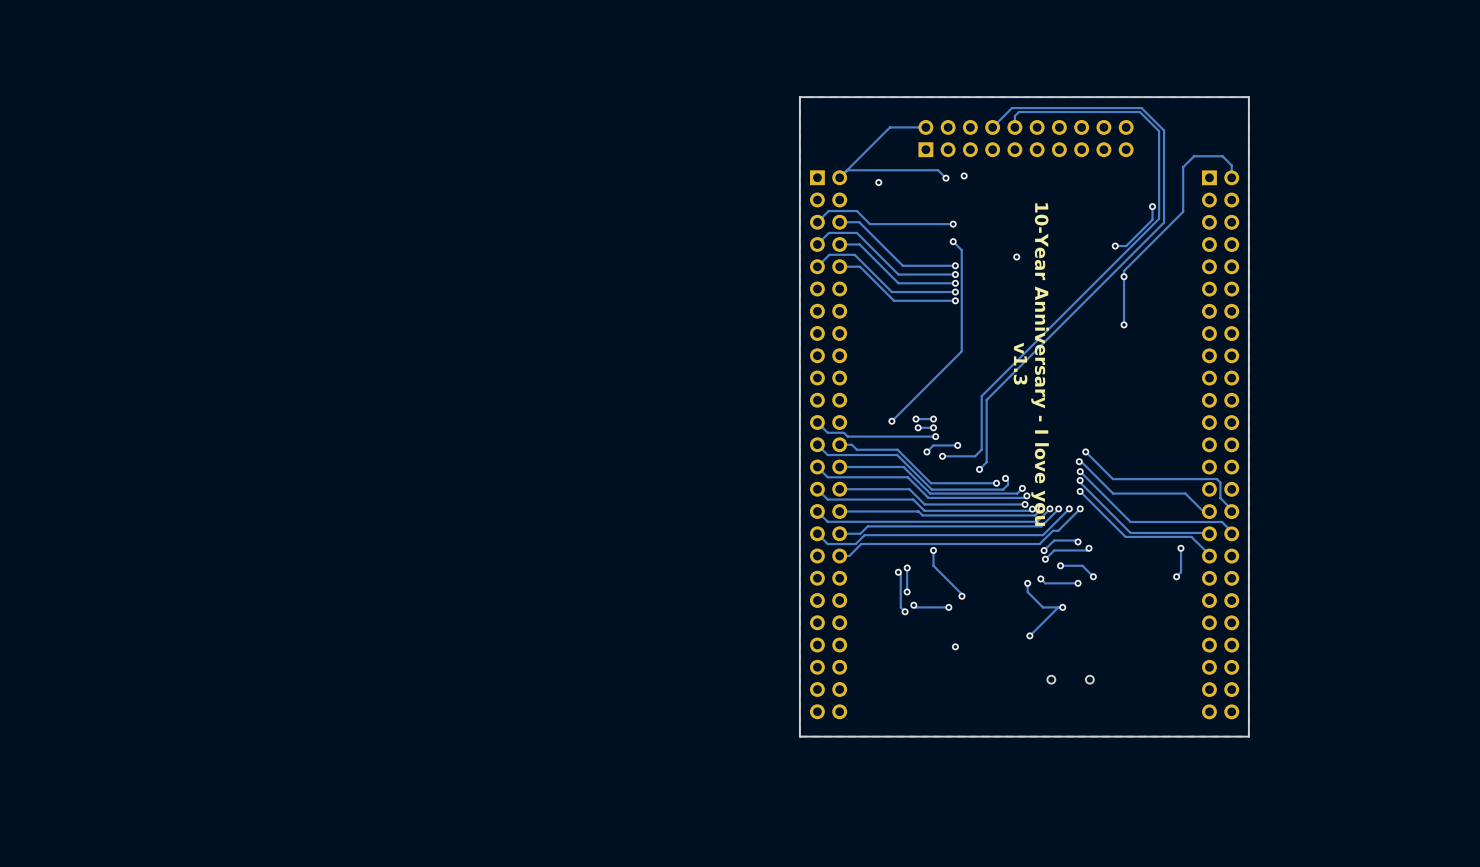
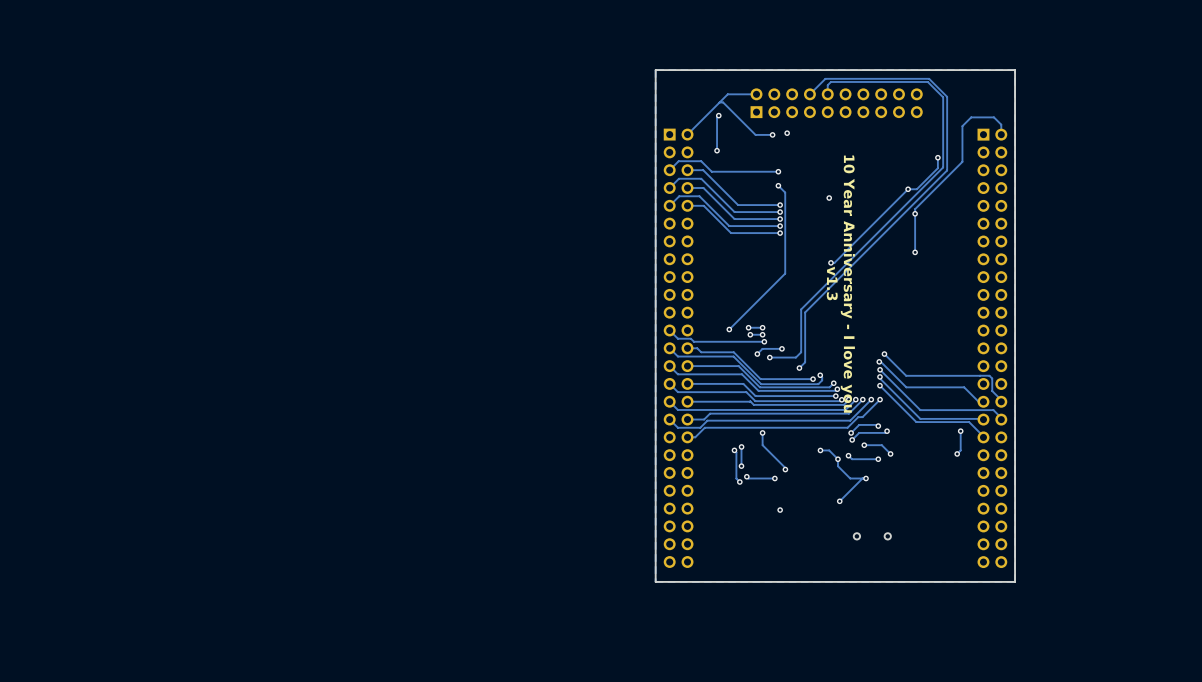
track: none -> (718, 115) (717, 117) (717, 150)
via: none -> (718, 115)
track: (847, 170) (938, 170) (945, 178) -> (719, 102) (723, 102) (755, 134) (772, 134)
via: (878, 182) -> none
via: none -> (717, 150)
track: none -> (908, 189) (834, 262) (830, 262)
via: none -> (830, 262)
text: 10-Year Anniversary - I love you (1040, 364) -> 10 Year Anniversary - I love you (847, 284)
track: none -> (820, 450) (829, 450) (837, 459)
via: none -> (820, 450)

